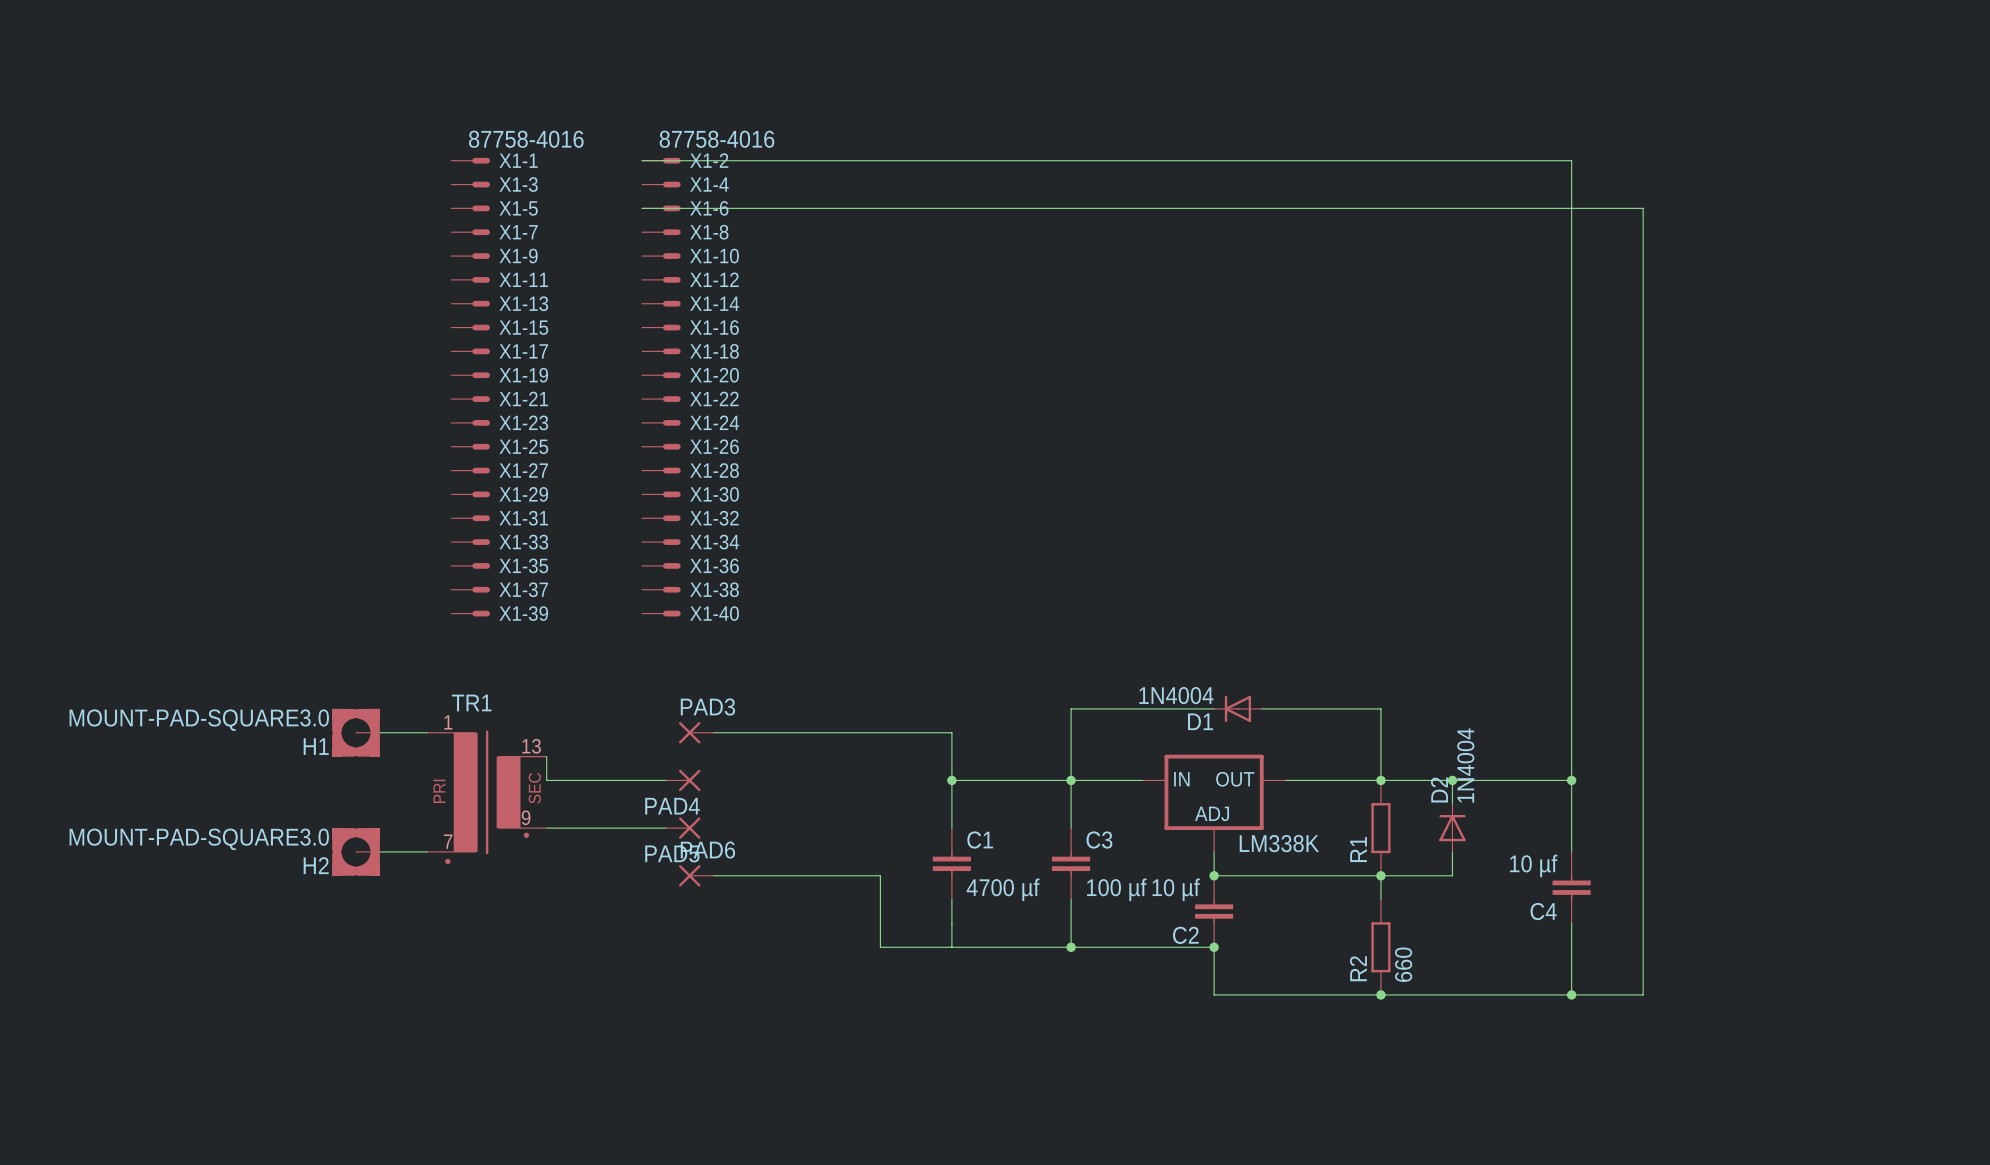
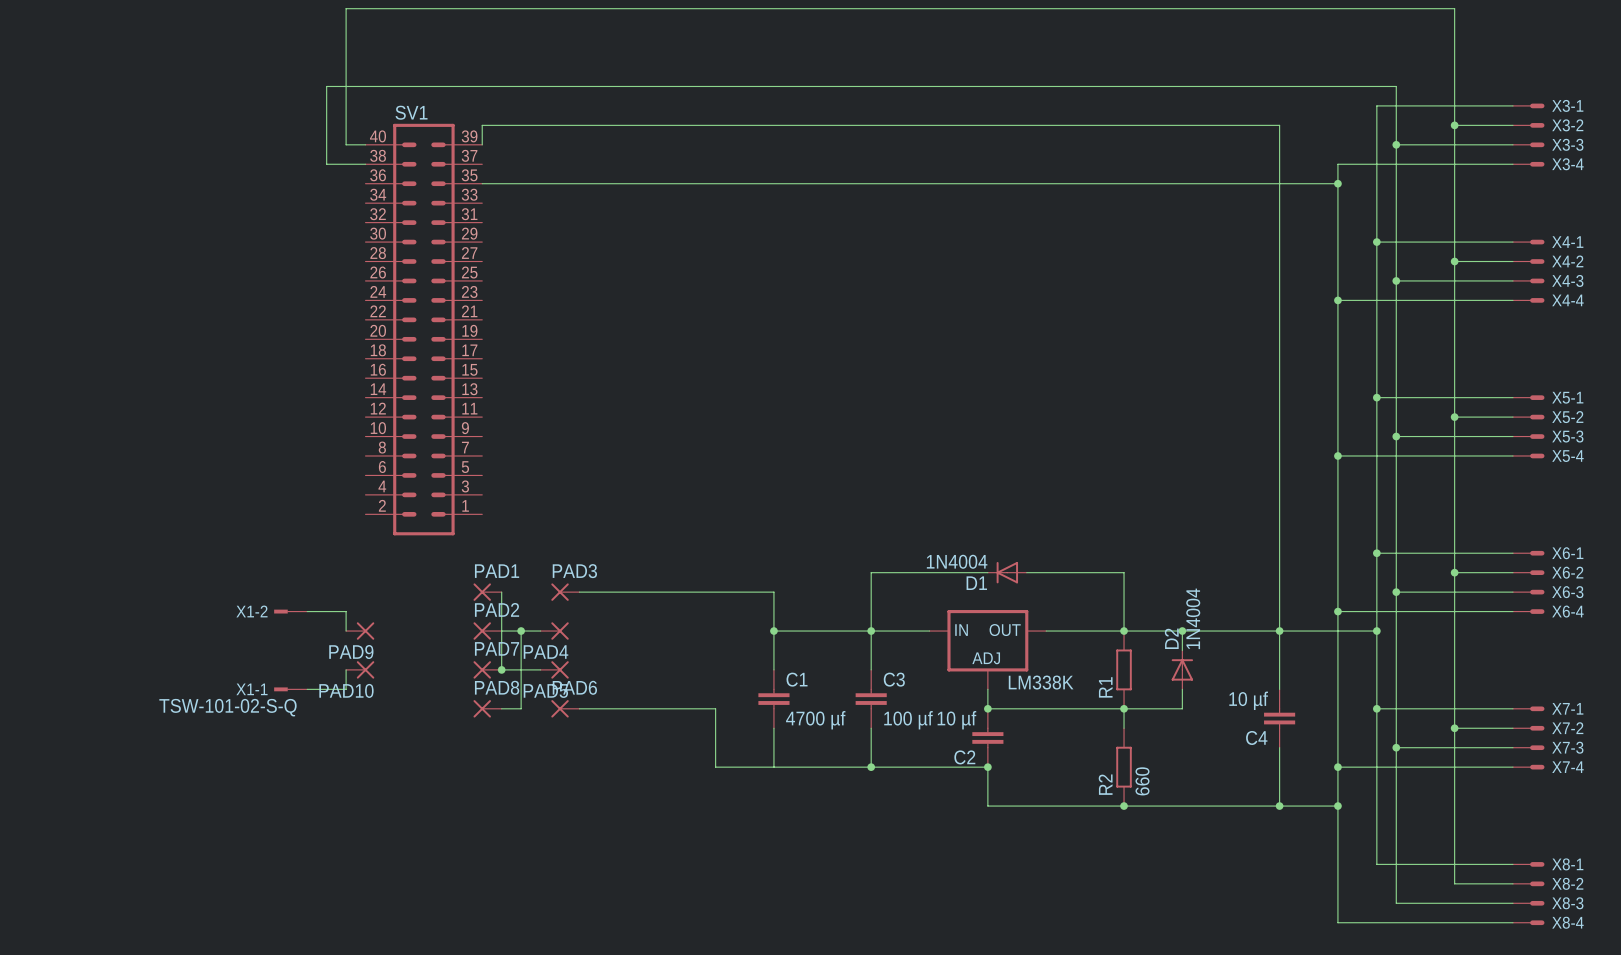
wire: none -> (1512, 105) (1376, 105) (1376, 864) (1512, 864)
X3-1: none -> (1528, 105)
X1-1 value: 87758-4016 (526, 139) -> TSW-101-02-S-Q (227, 707)
X1-2 value: 87758-4016 (716, 139) -> none
X1-1 symbol: [451, 157, 490, 164] -> [274, 687, 308, 692]
X1-2 symbol: [642, 157, 681, 164] -> [274, 609, 308, 614]
X1-1 name position: X1-1 (518, 160) -> X1-1 (251, 689)
wire: none -> (521, 125) (482, 125) (482, 144)
X1-2 name position: X1-2 (709, 160) -> X1-2 (251, 611)
wire: none -> (1454, 125) (1512, 125)
junction: none -> (1454, 125)
X3-2: none -> (1528, 125)
wire: none -> (365, 144) (346, 144) (346, 8) (1454, 8) (1454, 883) (1512, 883)
X1-3: (470, 184) -> none
X1-4: (661, 184) -> none
wire: none -> (1396, 144) (1512, 144)
junction: none -> (1396, 144)
X3-3: none -> (1528, 144)
wire: none -> (365, 164) (326, 164) (326, 86) (1396, 86) (1396, 903) (1512, 903)
X1-5: (470, 208) -> none
wire: (642, 208) (1643, 208) -> (1512, 164) (1337, 164)
X1-6: (661, 208) -> none
X3-4: none -> (1528, 164)
X1-7: (470, 232) -> none
wire: none -> (482, 183) (1337, 183)
X1-8: (661, 232) -> none
junction: none -> (1337, 183)
X1-9: (470, 256) -> none
X1-10: (661, 256) -> none
X1-11: (470, 279) -> none
X1-12: (661, 279) -> none
X1-13: (470, 303) -> none
X1-14: (661, 303) -> none
wire: none -> (1376, 242) (1512, 242)
junction: none -> (1376, 242)
X4-1: none -> (1528, 242)
X1-15: (470, 327) -> none
X1-16: (661, 327) -> none
wire: none -> (1454, 261) (1512, 261)
junction: none -> (1454, 261)
X4-2: none -> (1528, 261)
X1-17: (470, 351) -> none
X1-18: (661, 351) -> none
wire: none -> (1396, 280) (1512, 280)
junction: none -> (1396, 280)
X4-3: none -> (1528, 280)
X1-19: (470, 375) -> none
X1-20: (661, 375) -> none
wire: none -> (1337, 300) (1512, 300)
junction: none -> (1337, 300)
X4-4: none -> (1528, 300)
X1-21: (470, 399) -> none
X1-22: (661, 399) -> none
SV1: none -> (423, 329)
X1-23: (470, 422) -> none
X1-24: (661, 422) -> none
X1-25: (470, 446) -> none
X1-26: (661, 446) -> none
X1-27: (470, 470) -> none
X1-28: (661, 470) -> none
X1-29: (470, 494) -> none
X1-30: (661, 494) -> none
wire: none -> (1376, 397) (1512, 397)
junction: none -> (1376, 397)
X5-1: none -> (1528, 397)
X1-31: (470, 518) -> none
X1-32: (661, 518) -> none
wire: none -> (1454, 417) (1512, 417)
junction: none -> (1454, 417)
X5-2: none -> (1528, 417)
X1-33: (470, 542) -> none
X1-34: (661, 542) -> none
wire: none -> (1396, 436) (1512, 436)
junction: none -> (1396, 436)
X5-3: none -> (1528, 436)
X1-35: (470, 565) -> none
X1-36: (661, 565) -> none
wire: none -> (1337, 455) (1512, 455)
junction: none -> (1337, 455)
X5-4: none -> (1528, 455)
X1-37: (470, 589) -> none
X1-38: (661, 589) -> none
X1-39: (470, 613) -> none
X1-40: (661, 613) -> none
wire: none -> (1376, 553) (1512, 553)
junction: none -> (1376, 553)
X6-1: none -> (1528, 553)
wire: none -> (1454, 572) (1512, 572)
junction: none -> (1454, 572)
X6-2: none -> (1528, 572)
H1: MOUNT-PAD-SQUARE3.0 (356, 732) -> none
wire: (379, 732) (427, 732) -> none
PAD1: none -> (487, 592)
wire: none -> (1396, 592) (1512, 592)
junction: none -> (1396, 592)
X6-3: none -> (1528, 592)
wire: none -> (307, 611) (346, 611) (346, 631)
wire: (546, 756) (546, 780) (618, 780) -> none
wire: none -> (1337, 611) (1512, 611)
junction: none -> (1337, 611)
X6-4: none -> (1528, 611)
PAD9: none -> (360, 631)
PAD2: none -> (487, 631)
wire: none -> (521, 631) (521, 708) (501, 708)
junction: none -> (521, 631)
wire: none -> (1279, 631) (1376, 631)
junction: none -> (1376, 631)
TR1: (487, 797) -> none
wire: none -> (346, 669) (346, 689)
PAD10: none -> (360, 669)
wire: (546, 828) (618, 828) -> (501, 592) (501, 669)
PAD7: none -> (487, 669)
junction: none -> (501, 669)
H2: MOUNT-PAD-SQUARE3.0 (356, 851) -> none
PAD8: none -> (487, 708)
wire: none -> (1376, 708) (1512, 708)
junction: none -> (1376, 708)
X7-1: none -> (1528, 708)
wire: none -> (1454, 728) (1512, 728)
junction: none -> (1454, 728)
X7-2: none -> (1528, 728)
wire: none -> (1396, 747) (1512, 747)
junction: none -> (1396, 747)
X7-3: none -> (1528, 747)
wire: none -> (1337, 767) (1512, 767)
junction: none -> (1337, 767)
X7-4: none -> (1528, 767)
wire: none -> (1337, 806) (1337, 922) (1512, 922)
junction: none -> (1337, 806)
X8-1: none -> (1528, 864)
X8-2: none -> (1528, 883)
X8-3: none -> (1528, 903)
X8-4: none -> (1528, 922)

